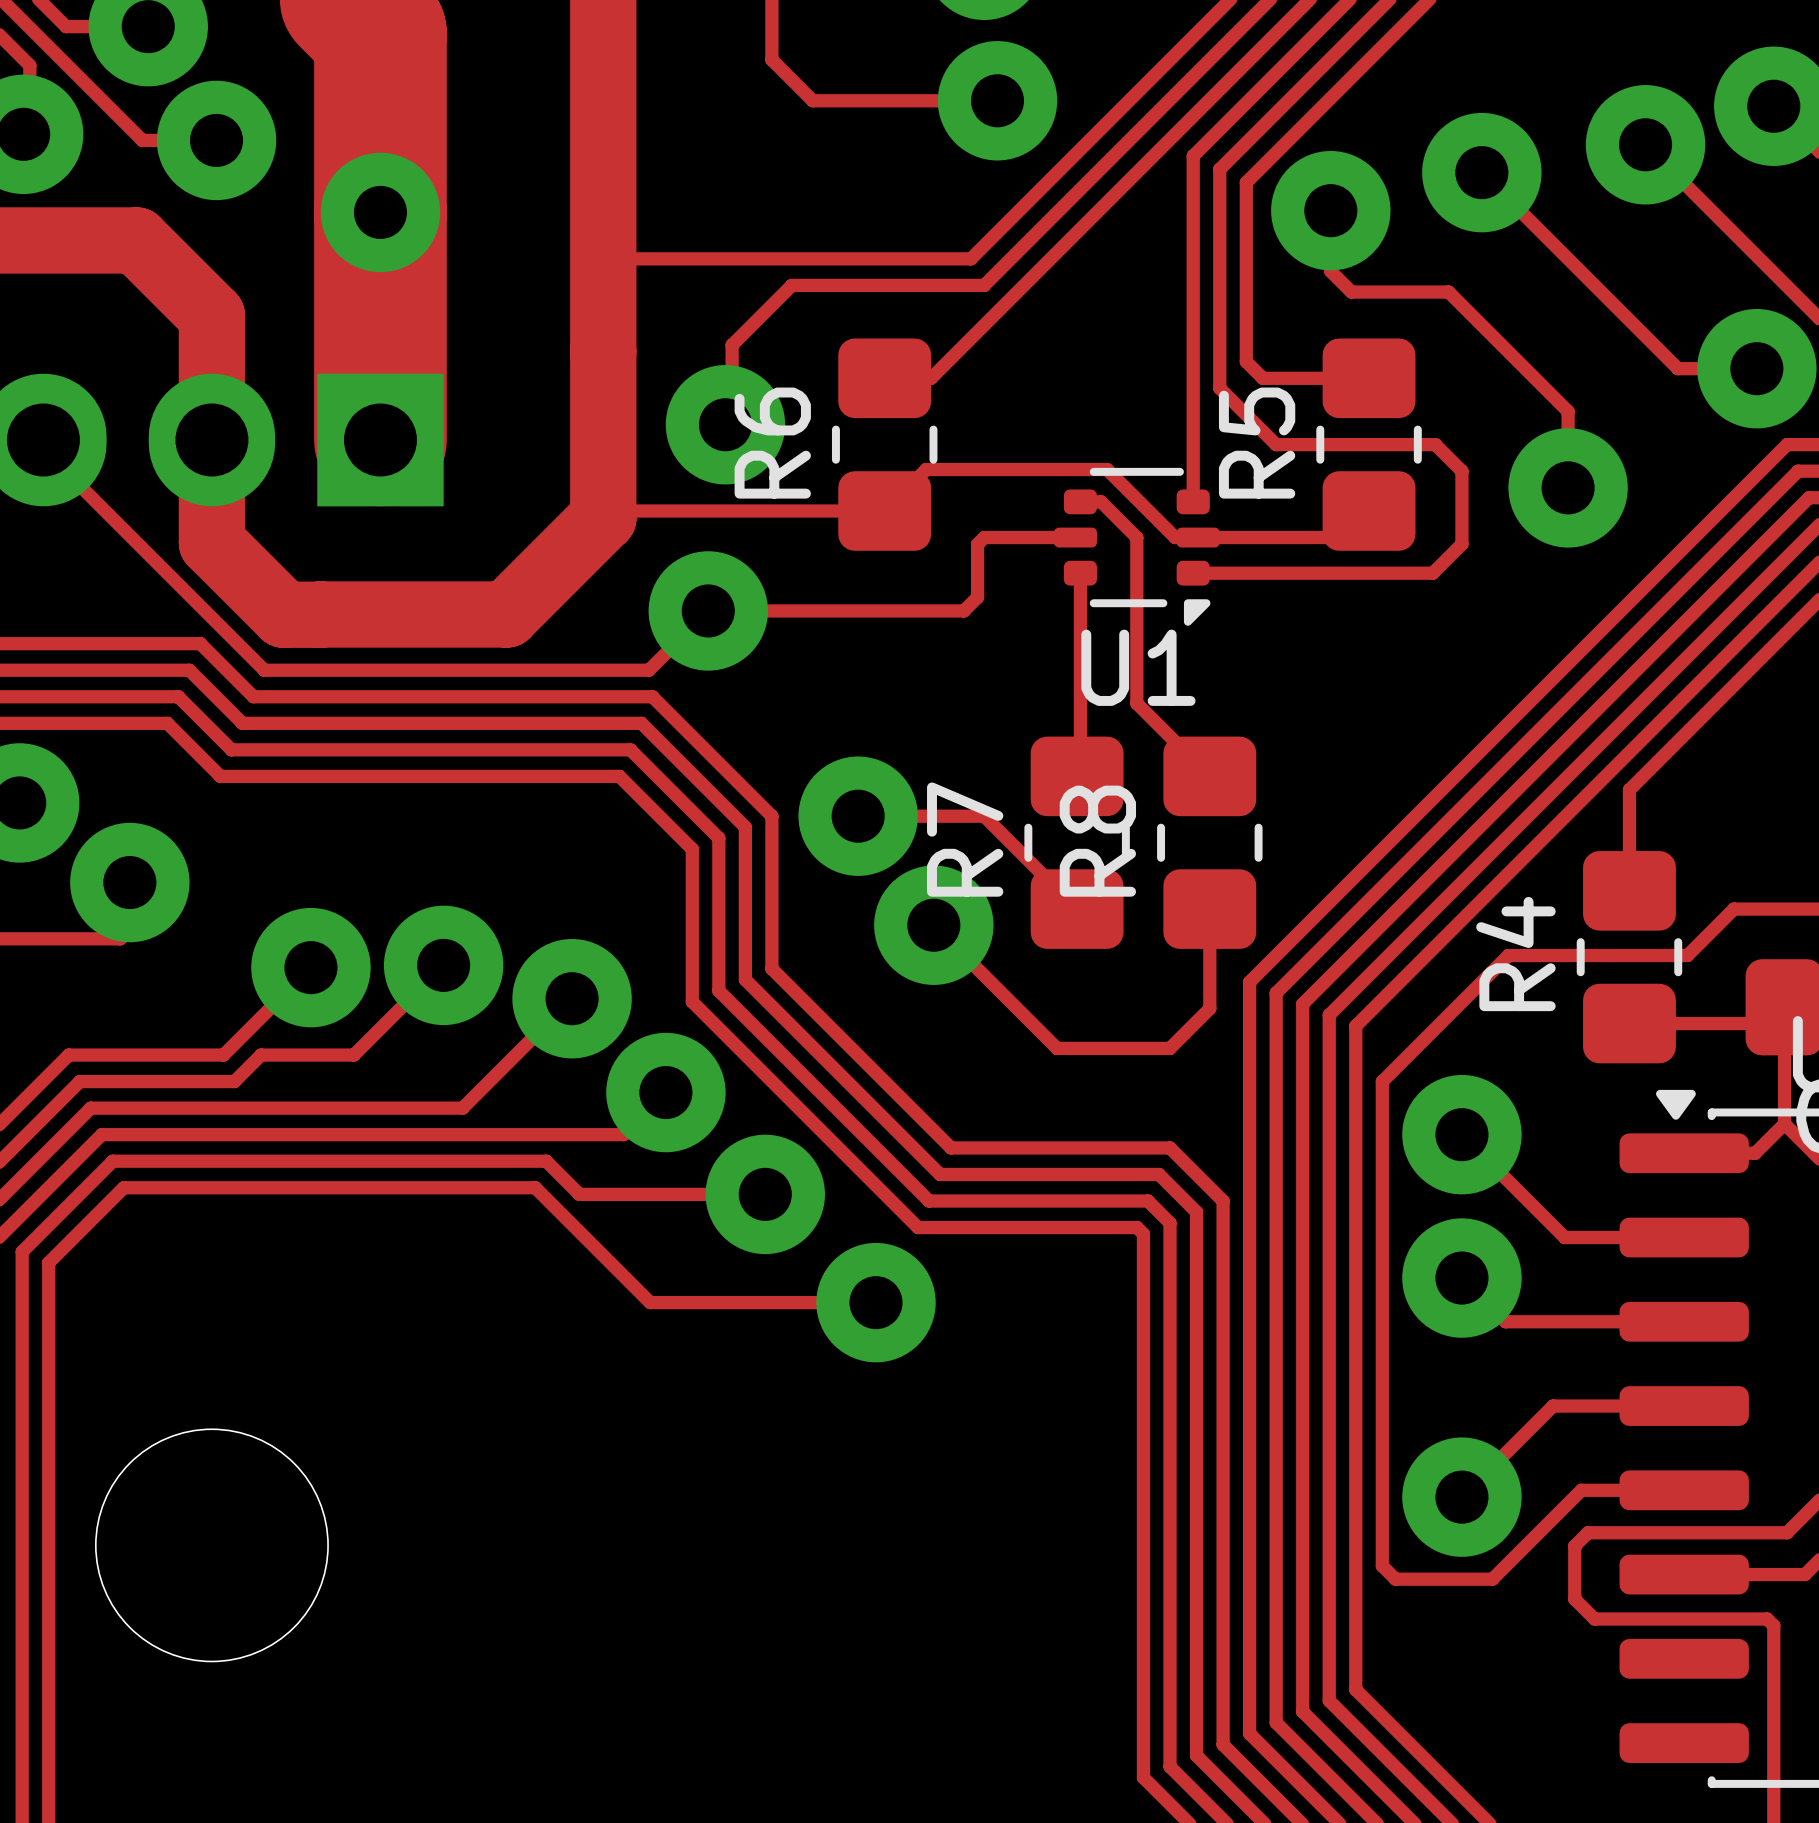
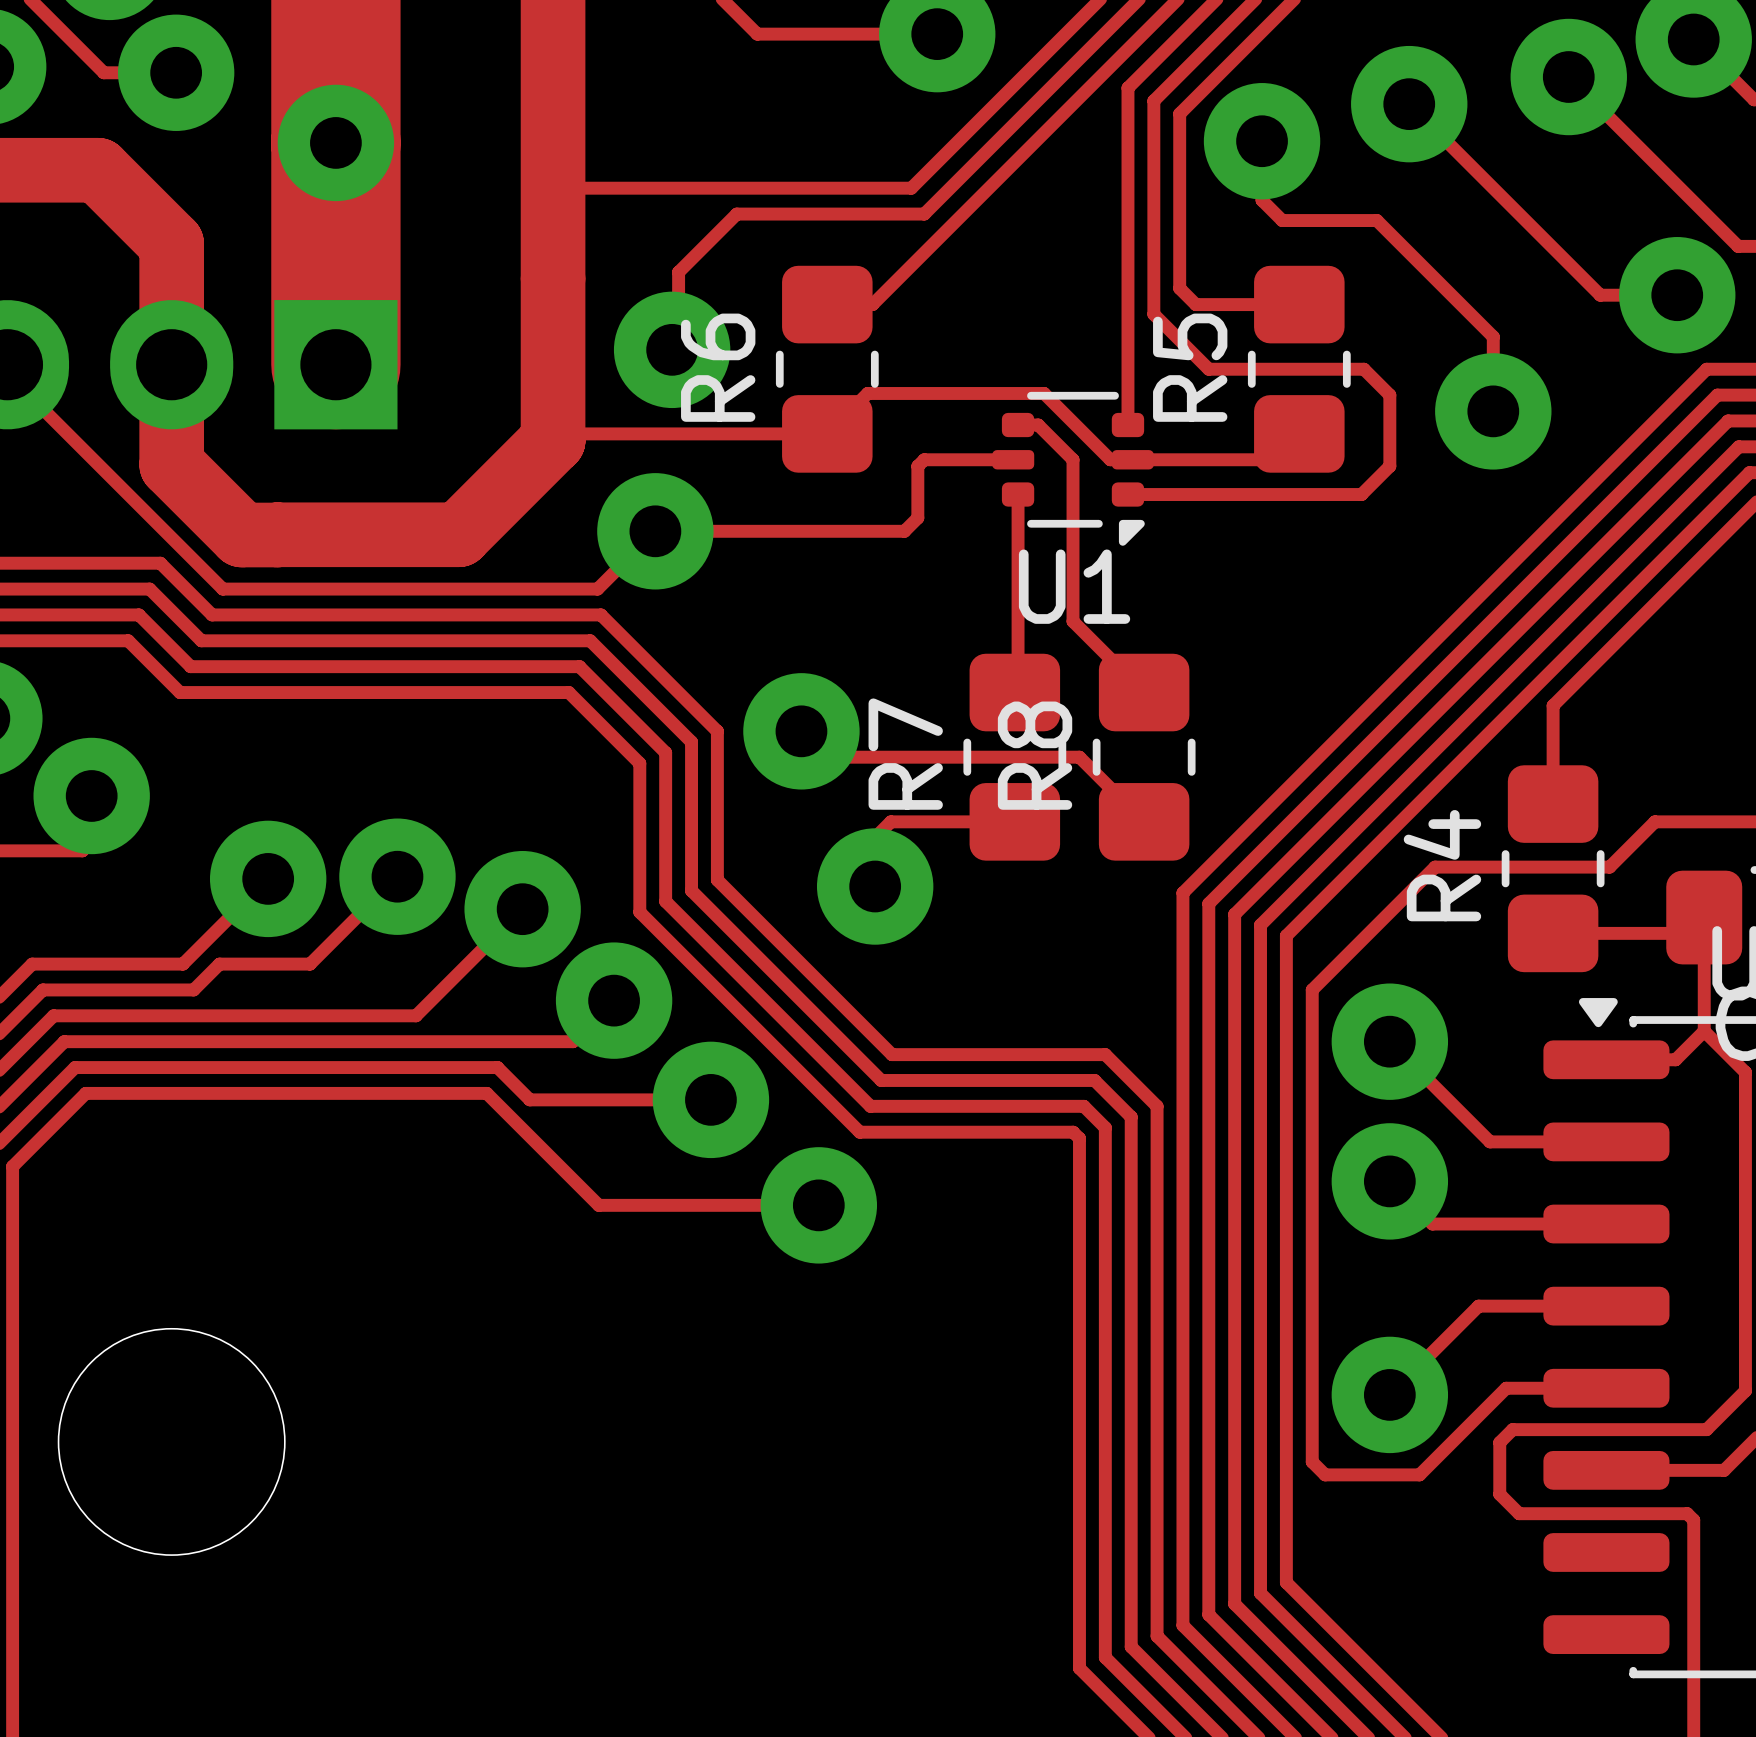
track: (858, 816) (984, 816) (1077, 909) -> (801, 731) (827, 757) (1079, 757) (1144, 821)
track: none -> (1014, 821) (890, 821) (875, 837) (875, 886)
track: (1209, 909) (1209, 1008) (1170, 1048) (1057, 1048) (933, 925) -> none
via position: (933, 925) -> (875, 886)

